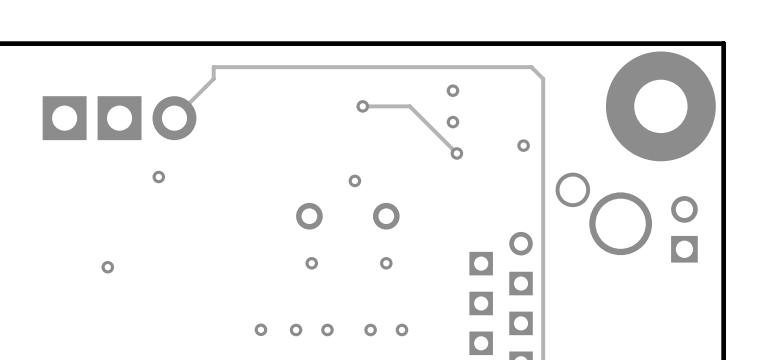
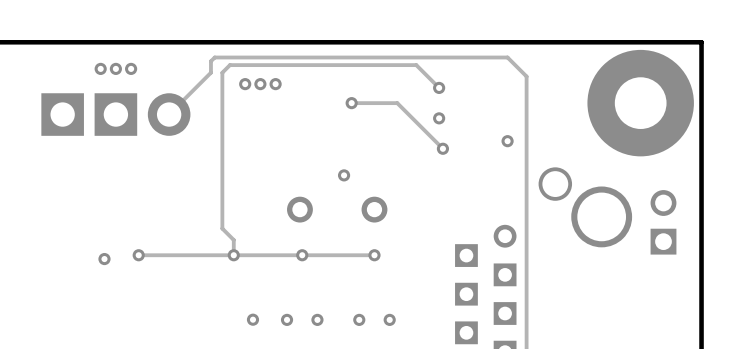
track: (237, 67) (213, 67) (213, 78) -> (229, 65) (222, 72) (222, 228) (233, 240) (233, 255)
track: (531, 67) (429, 67) -> (439, 87) (416, 65)
track: none -> (515, 65) (507, 57) (214, 57) (210, 61) (210, 72) (207, 76)
via: none -> (100, 68)
via: none -> (115, 68)
via: none -> (131, 68)
via: none -> (245, 84)
via: none -> (260, 84)
via: none -> (275, 84)
via: (158, 176) -> none
via: none -> (138, 255)
via: none -> (233, 255)
track: none -> (374, 255) (138, 255)

